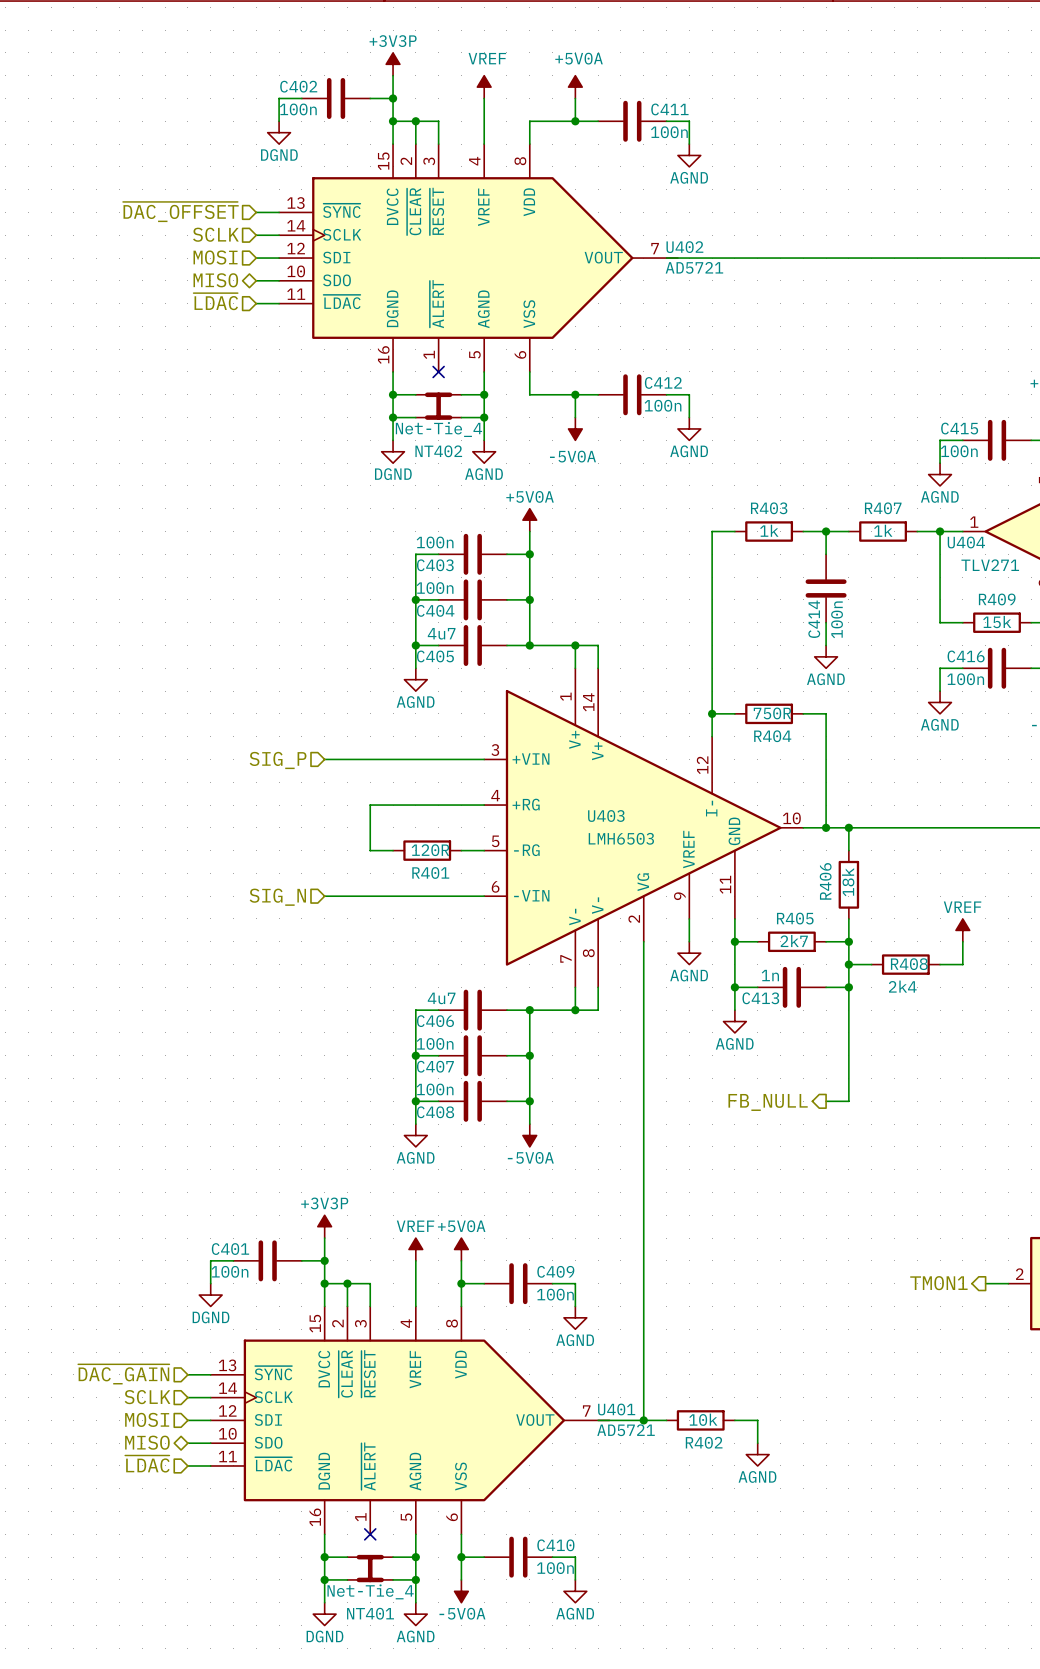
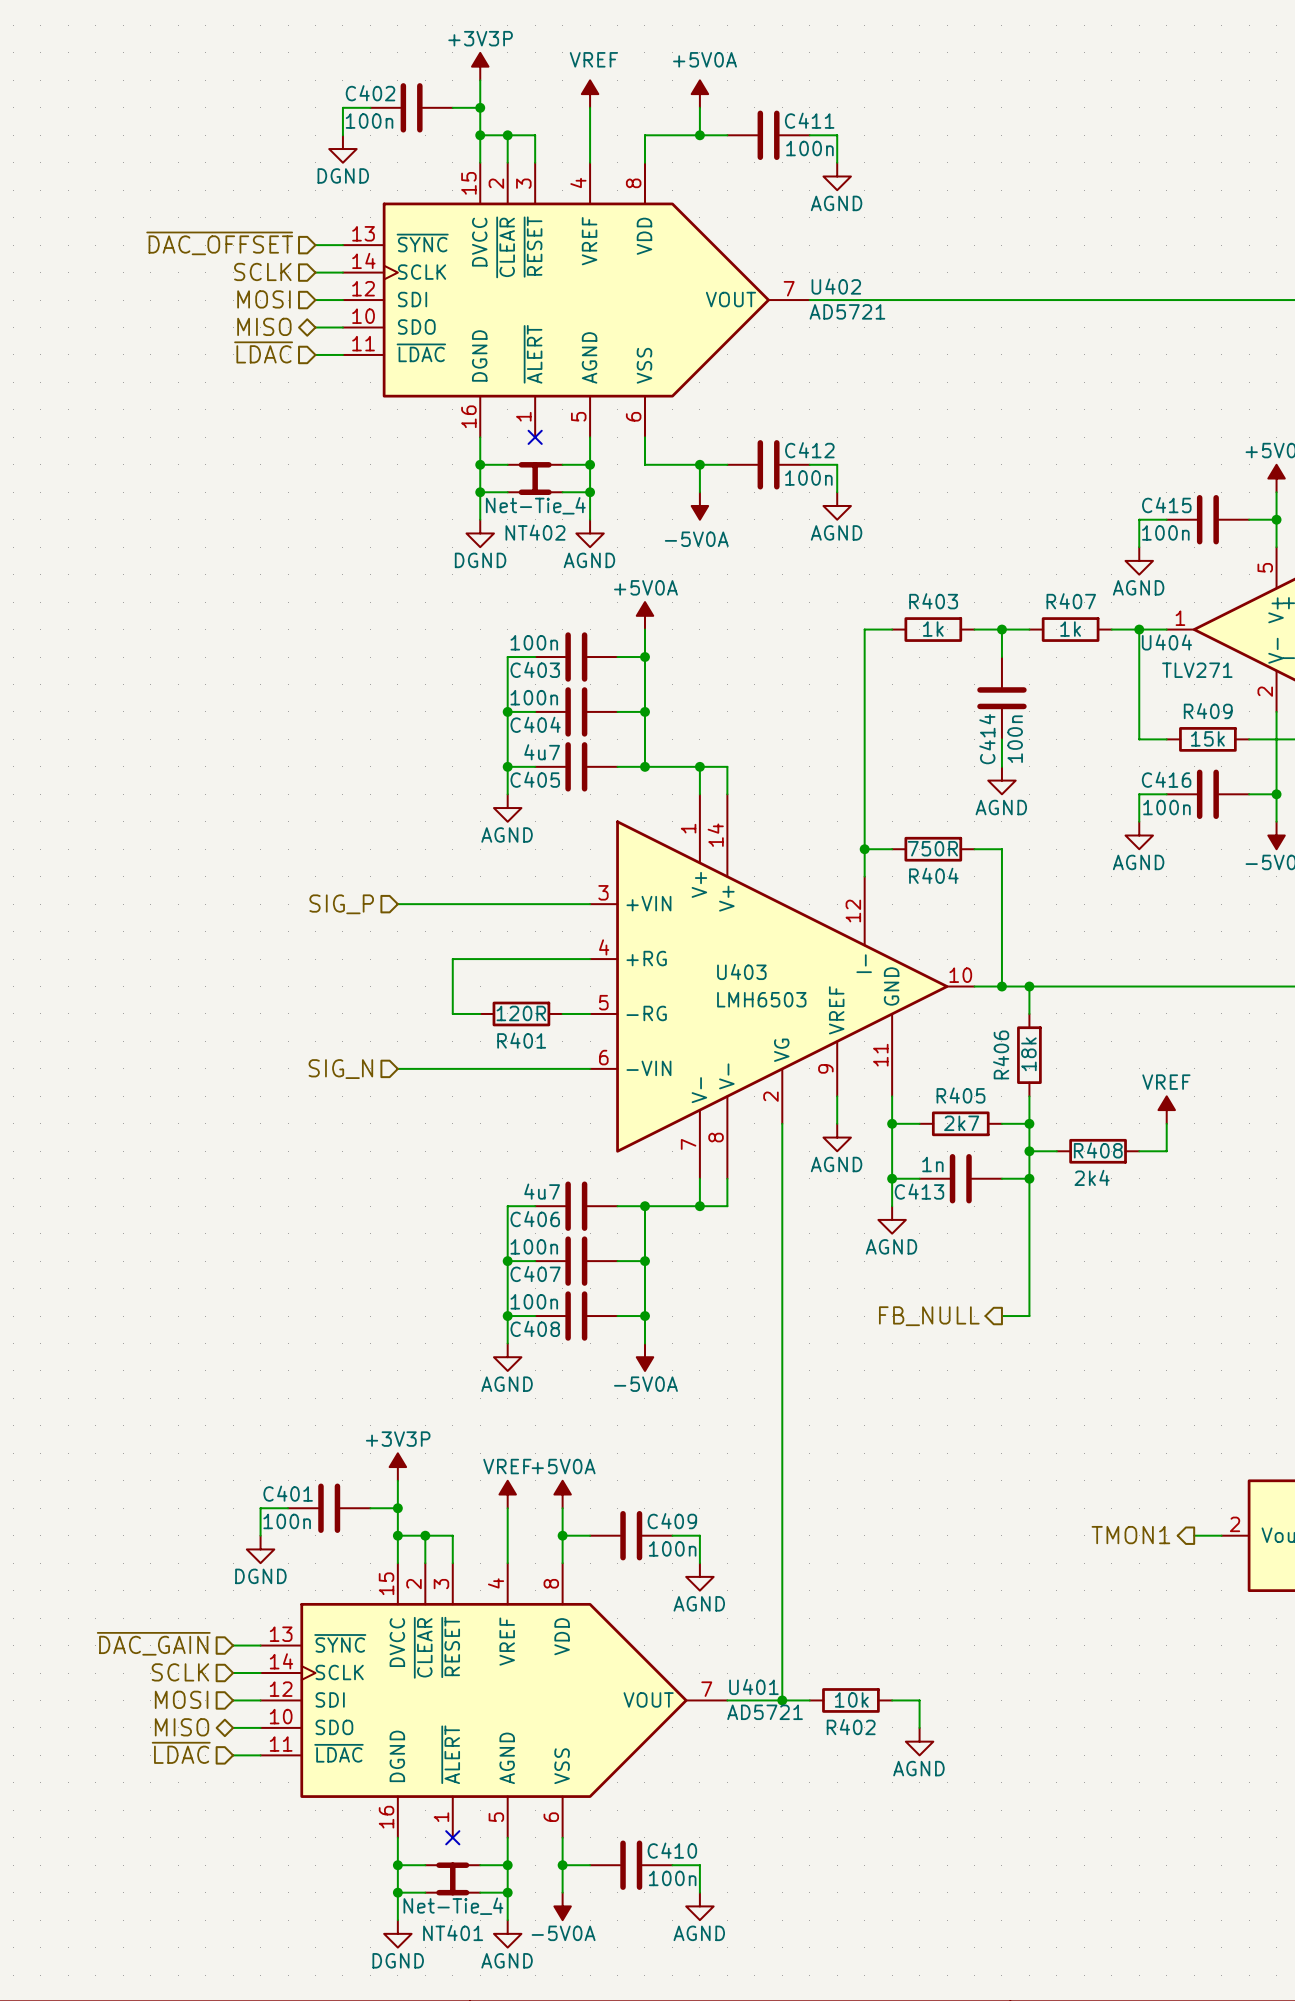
U402 symbol: [279, 144, 678, 372] -> [342, 162, 810, 438]
U401 symbol: [210, 1306, 610, 1535] -> [260, 1563, 728, 1838]

